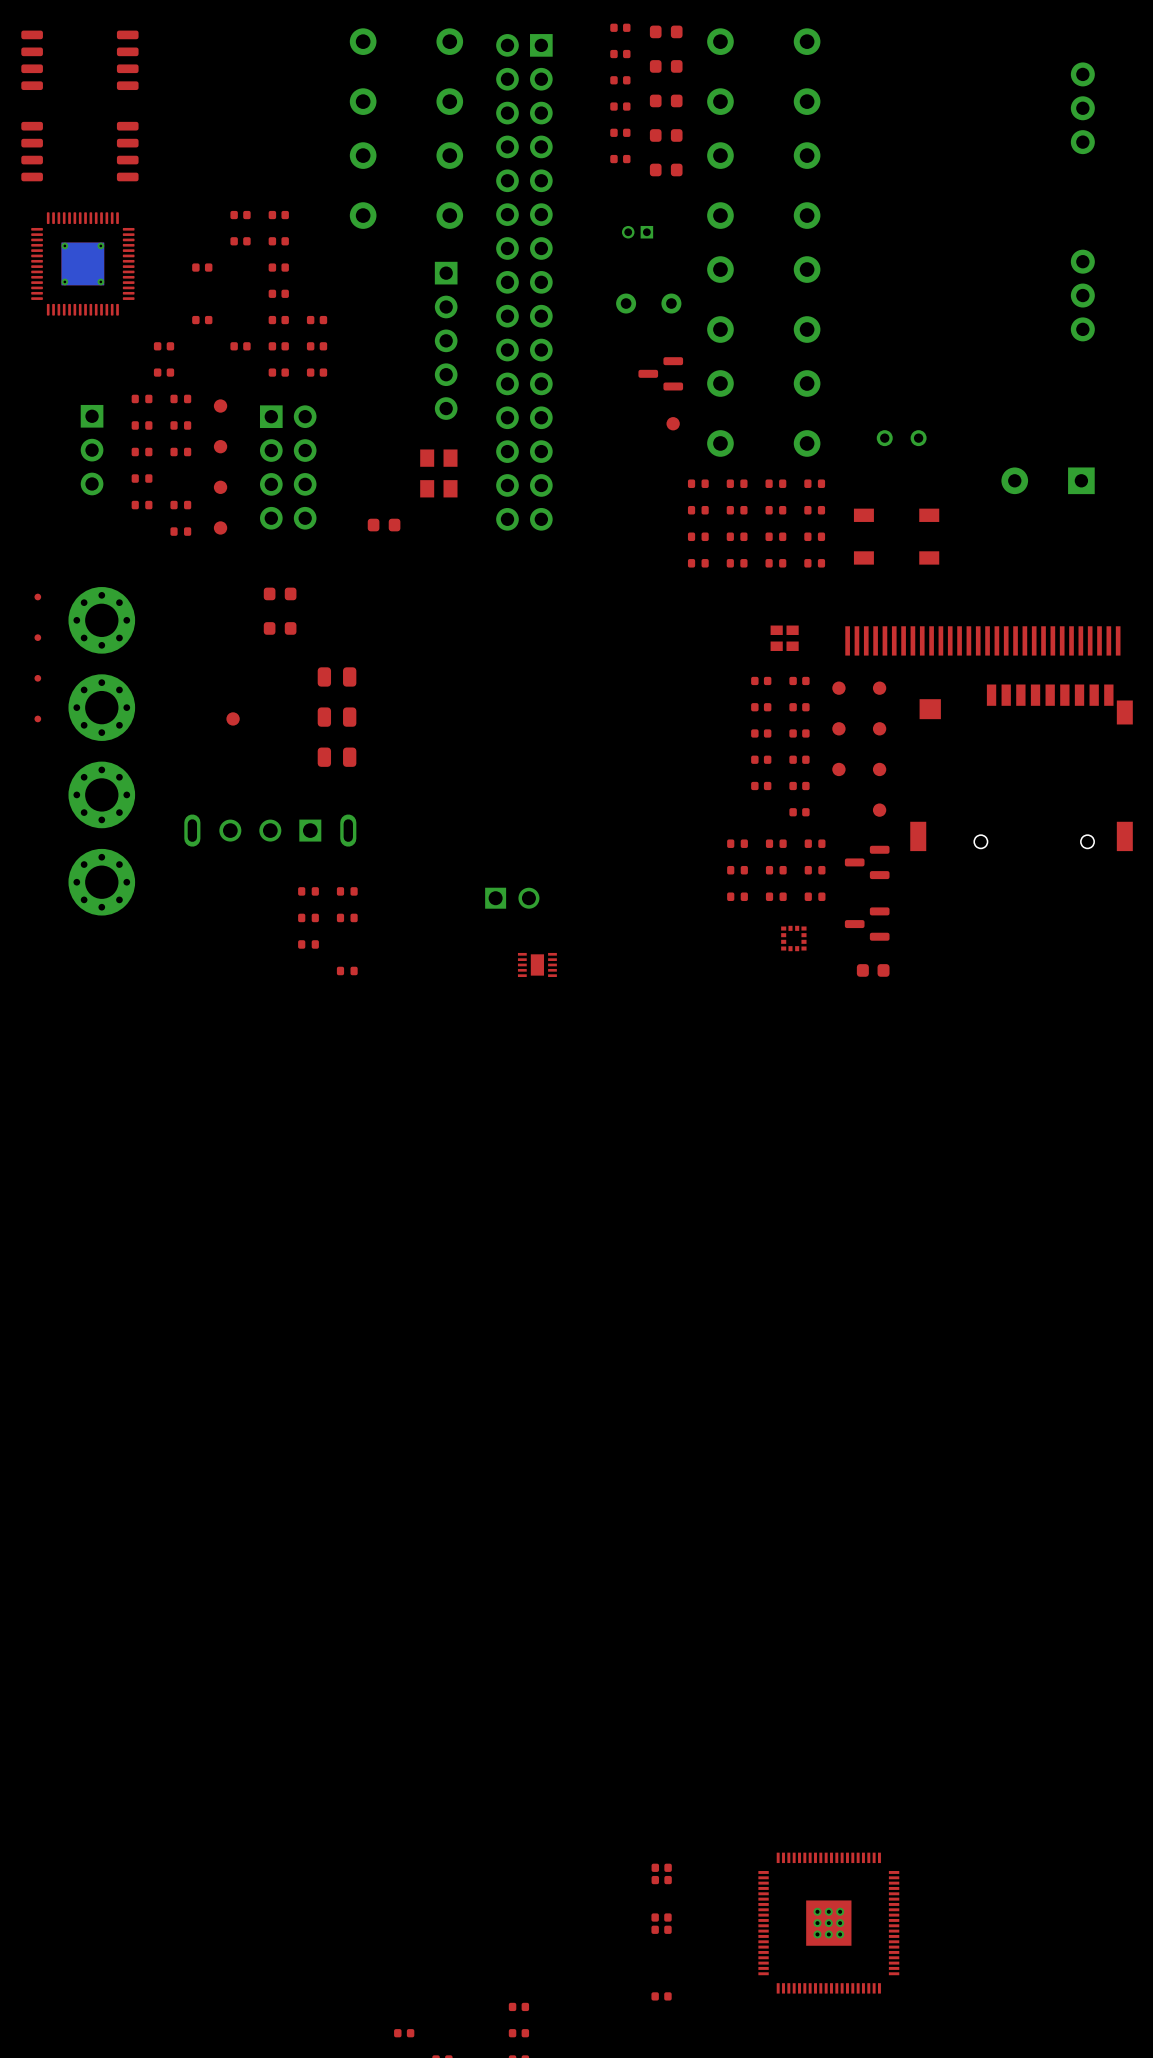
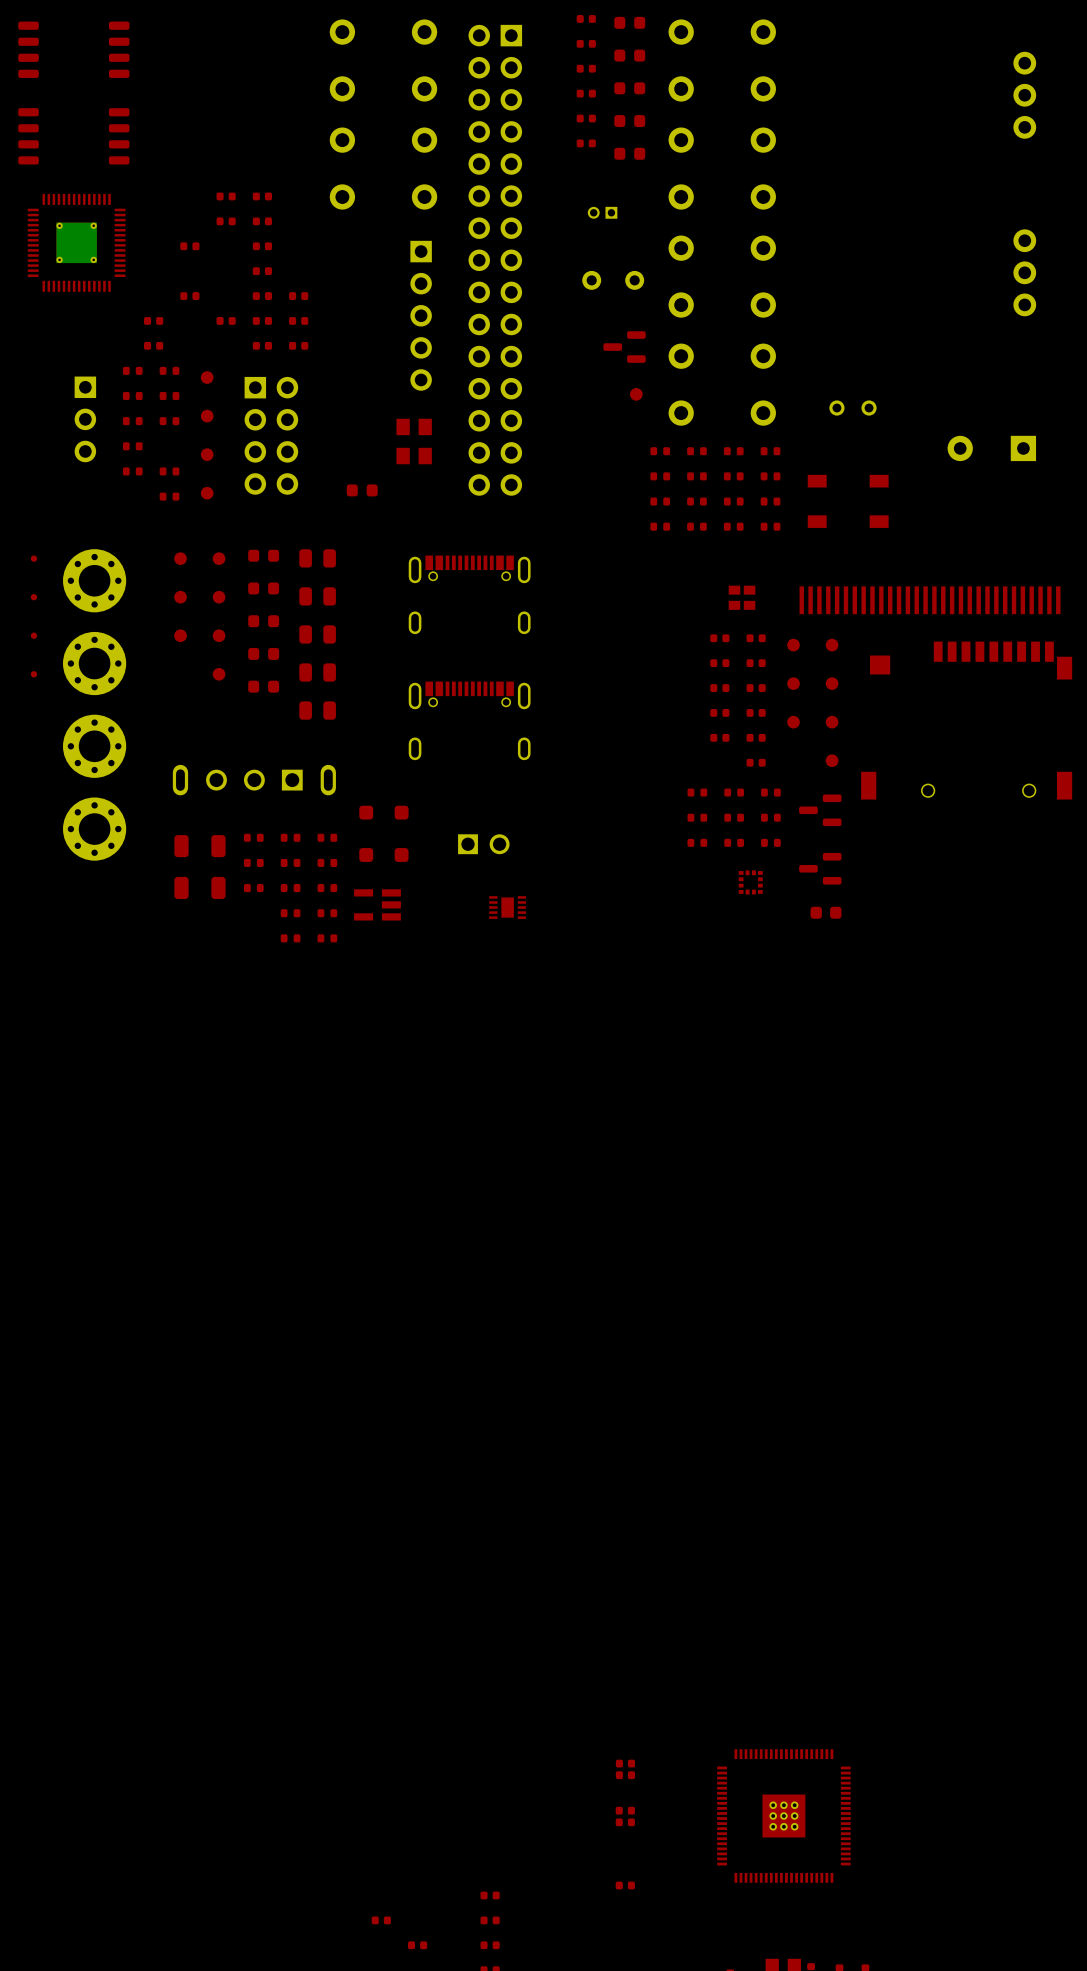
part: none -> (317, 558)
part: none -> (180, 558)
part: none -> (219, 558)
part: none -> (469, 594)
part: none -> (317, 596)
part: none -> (180, 597)
part: none -> (219, 597)
part: none -> (263, 621)
part: none -> (180, 635)
part: none -> (219, 635)
part: none -> (263, 653)
part: none -> (263, 686)
part: none -> (469, 720)
part: none -> (383, 812)
part: none -> (253, 837)
part: none -> (199, 846)
part: none -> (383, 854)
part: none -> (253, 862)
part: none -> (199, 887)
part: none -> (253, 888)
part: none -> (327, 888)
part: none -> (377, 904)
part: none -> (290, 913)
part: none -> (290, 938)
part: none -> (327, 938)

